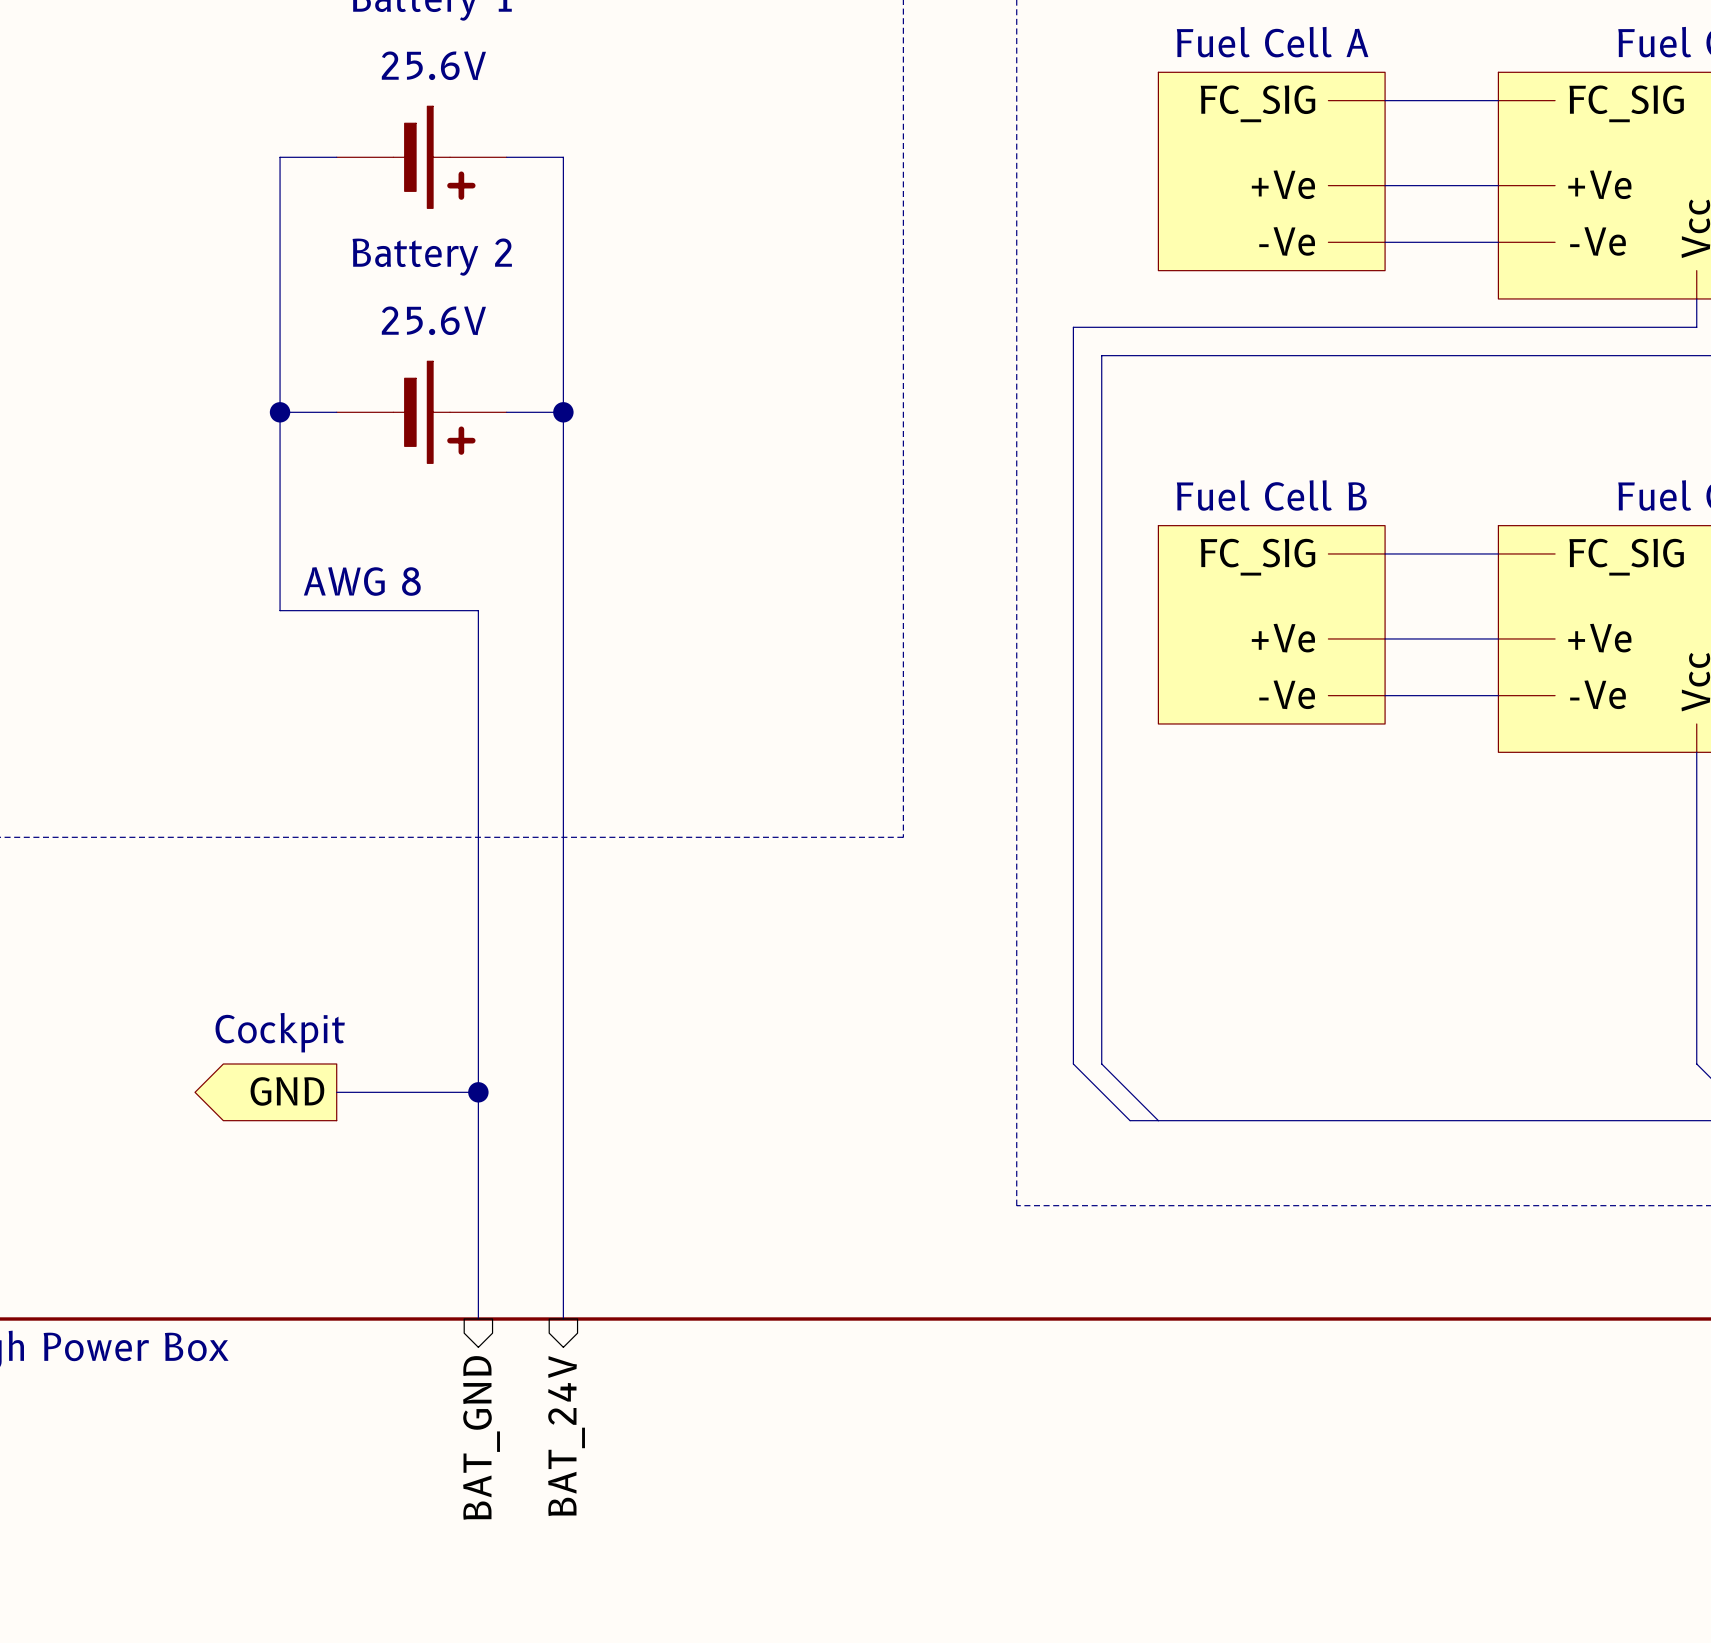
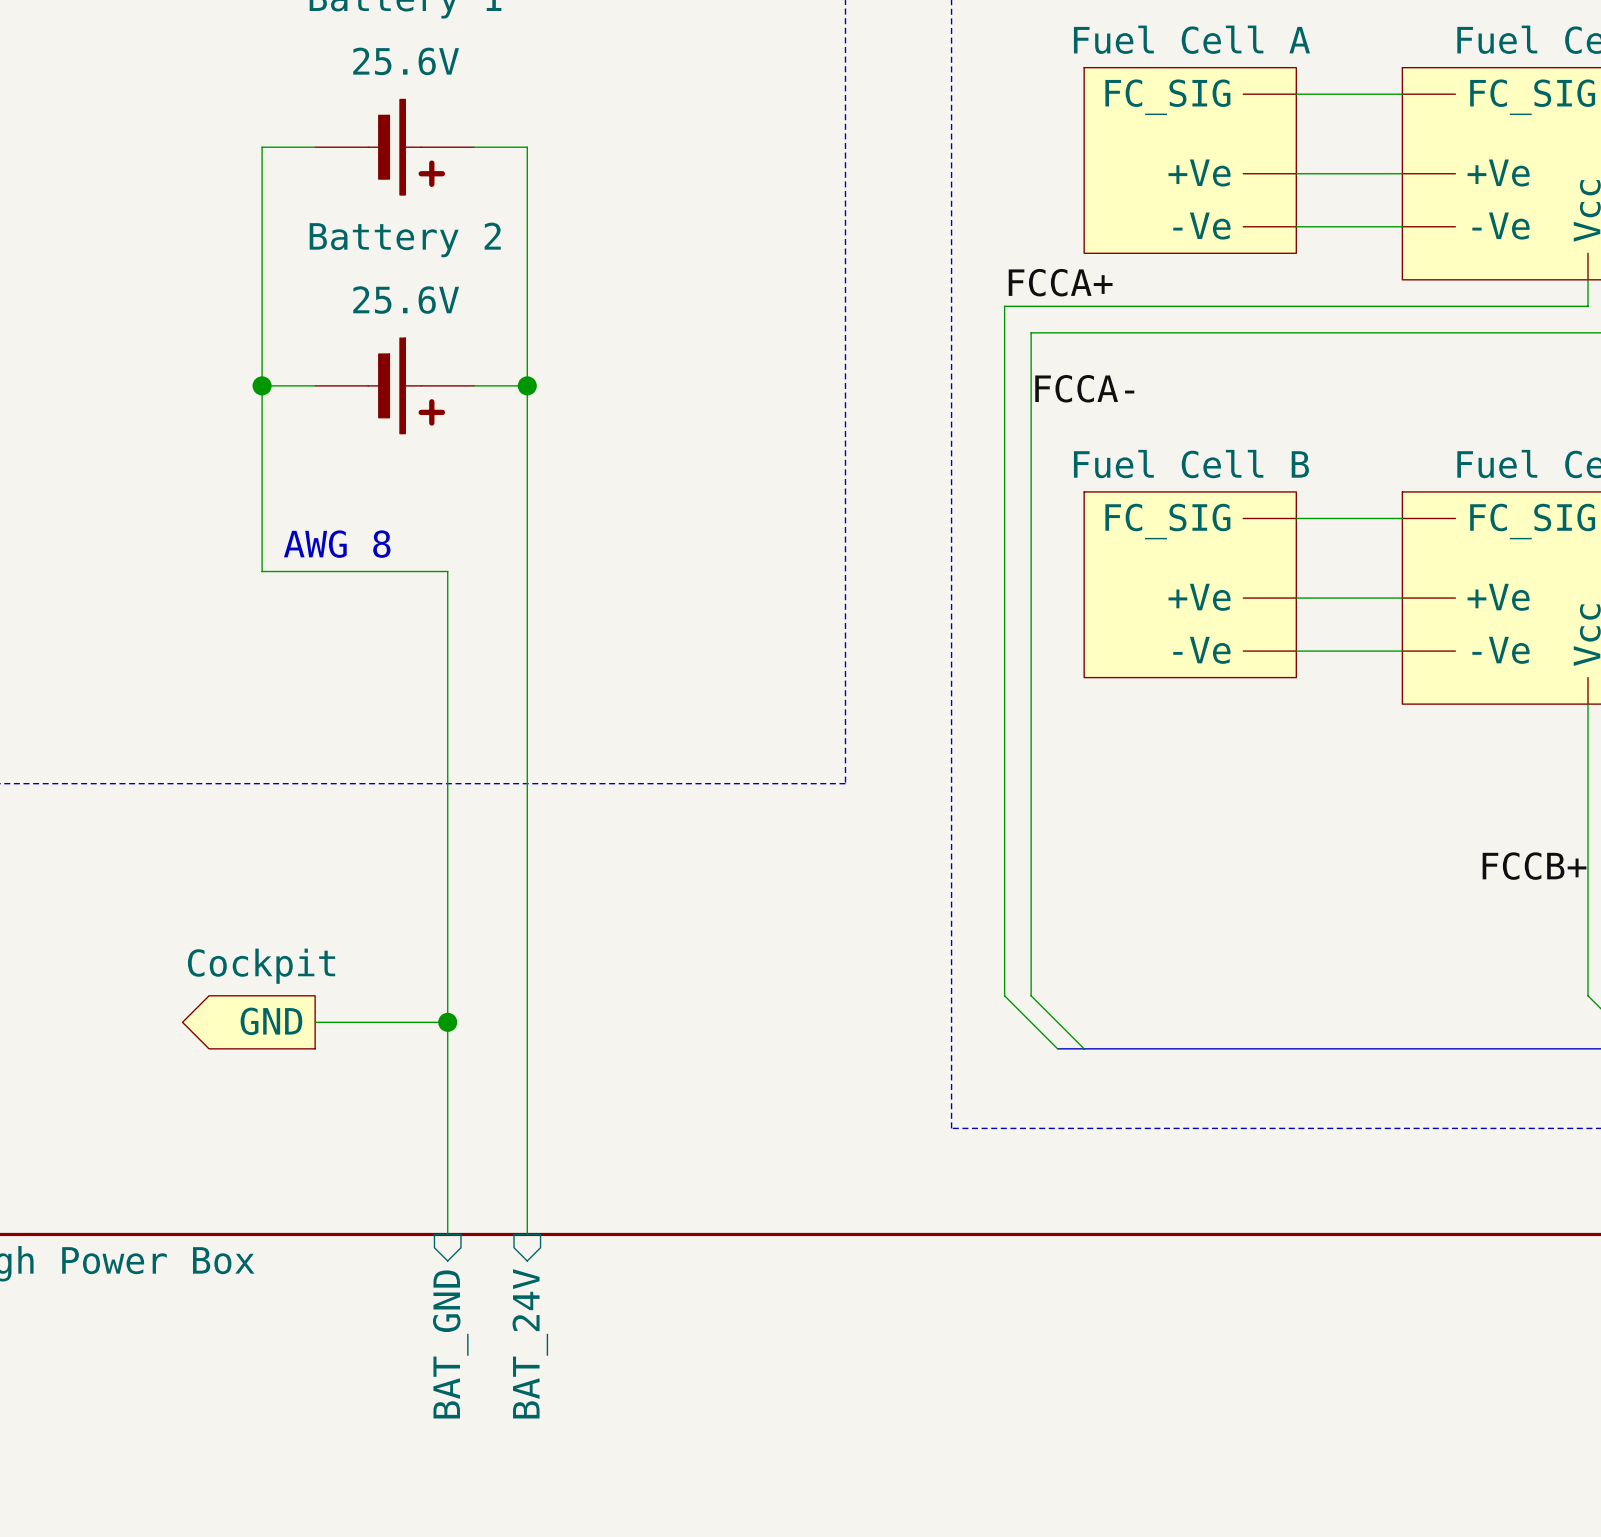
label: none -> FCCA+ (1060, 282)
label: none -> FCCA- (1084, 388)
label: none -> FCCB+ (1534, 866)

